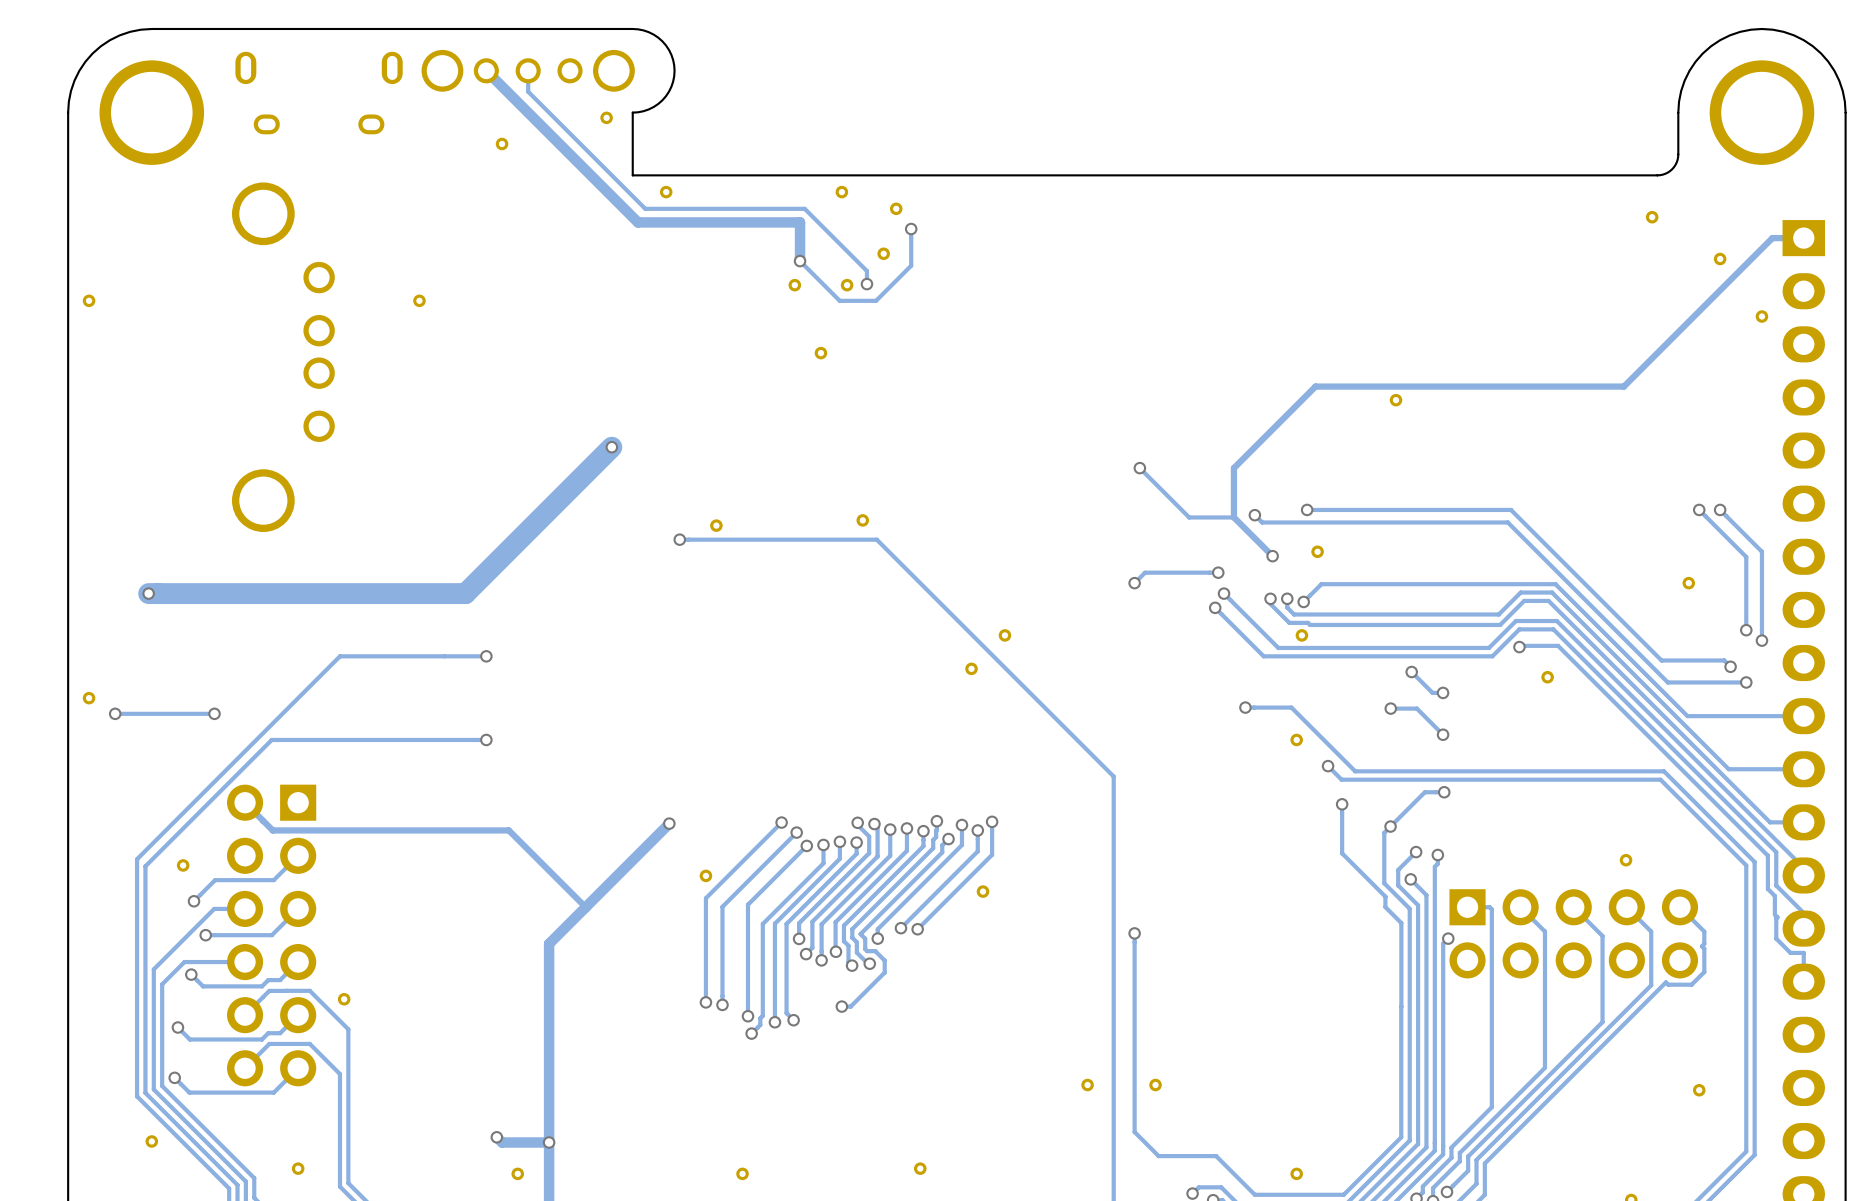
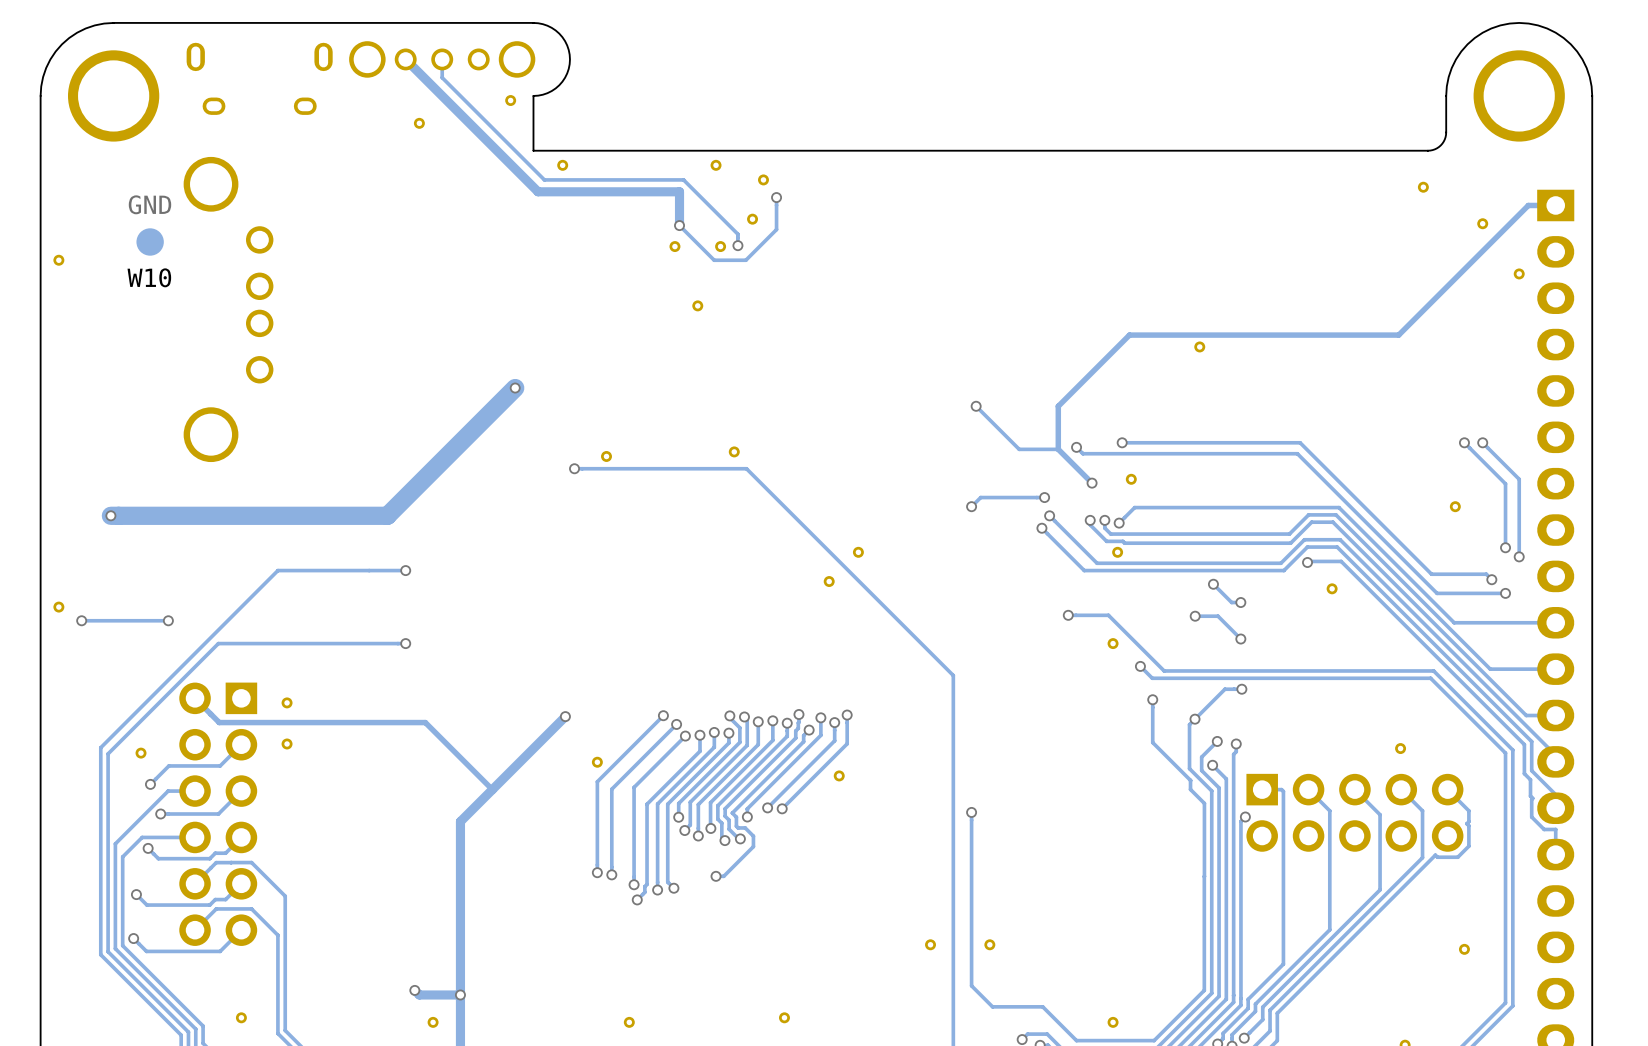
W10: none -> GND (150, 241)
part: (419, 300) -> none
part: none -> (287, 702)
part: none -> (287, 743)
part: (344, 999) -> none
part: (151, 1141) -> none

